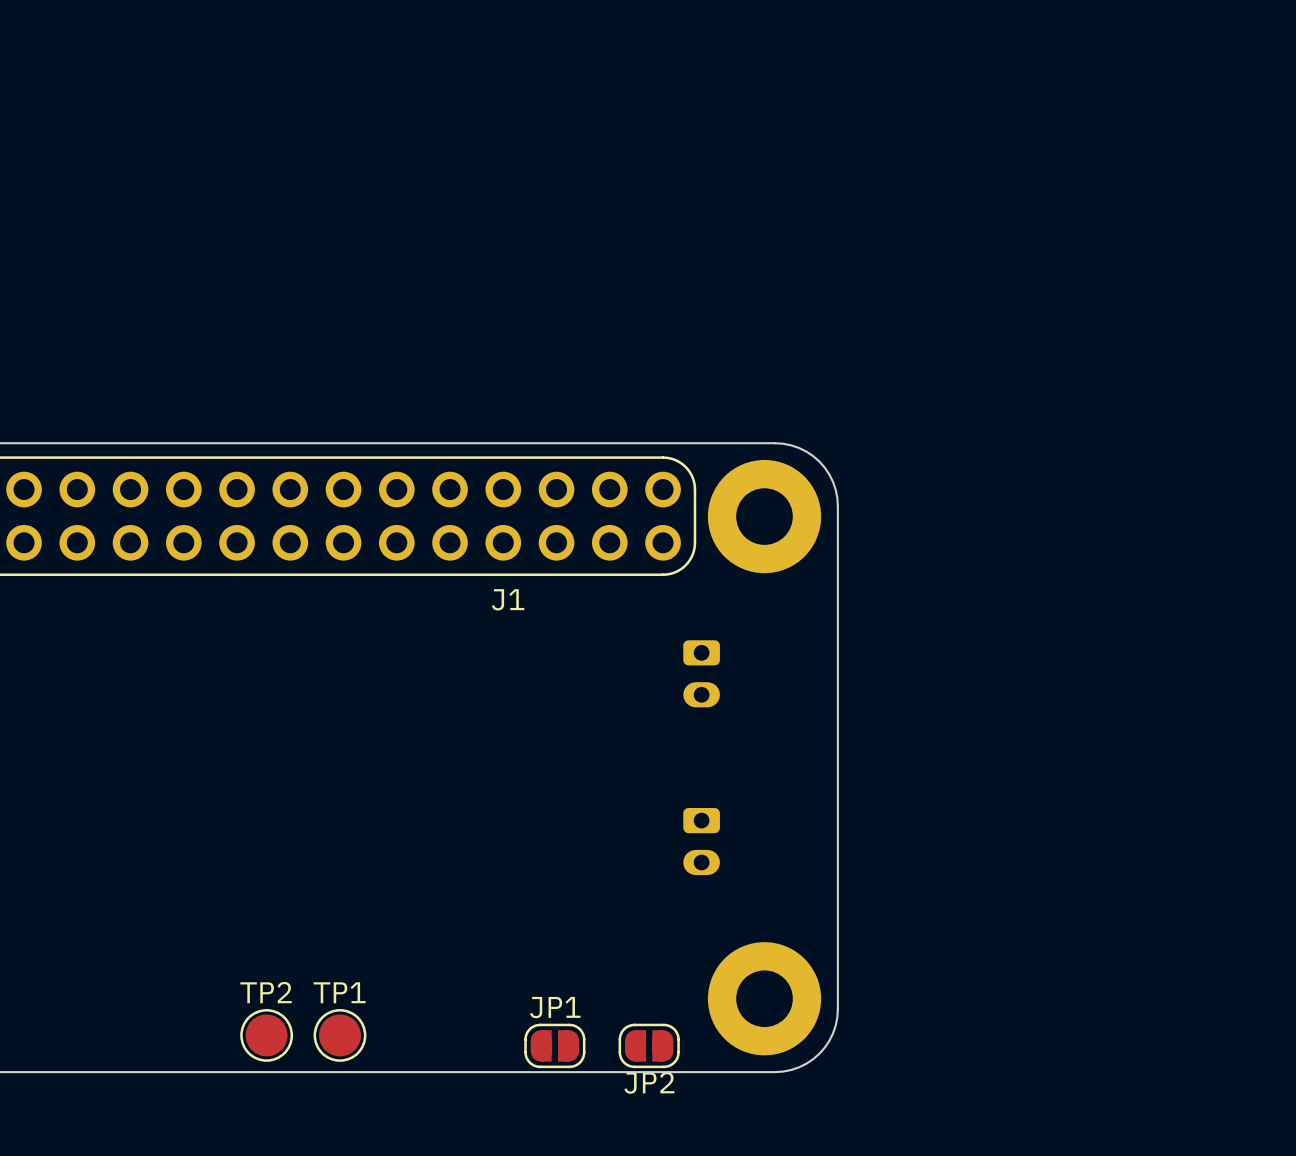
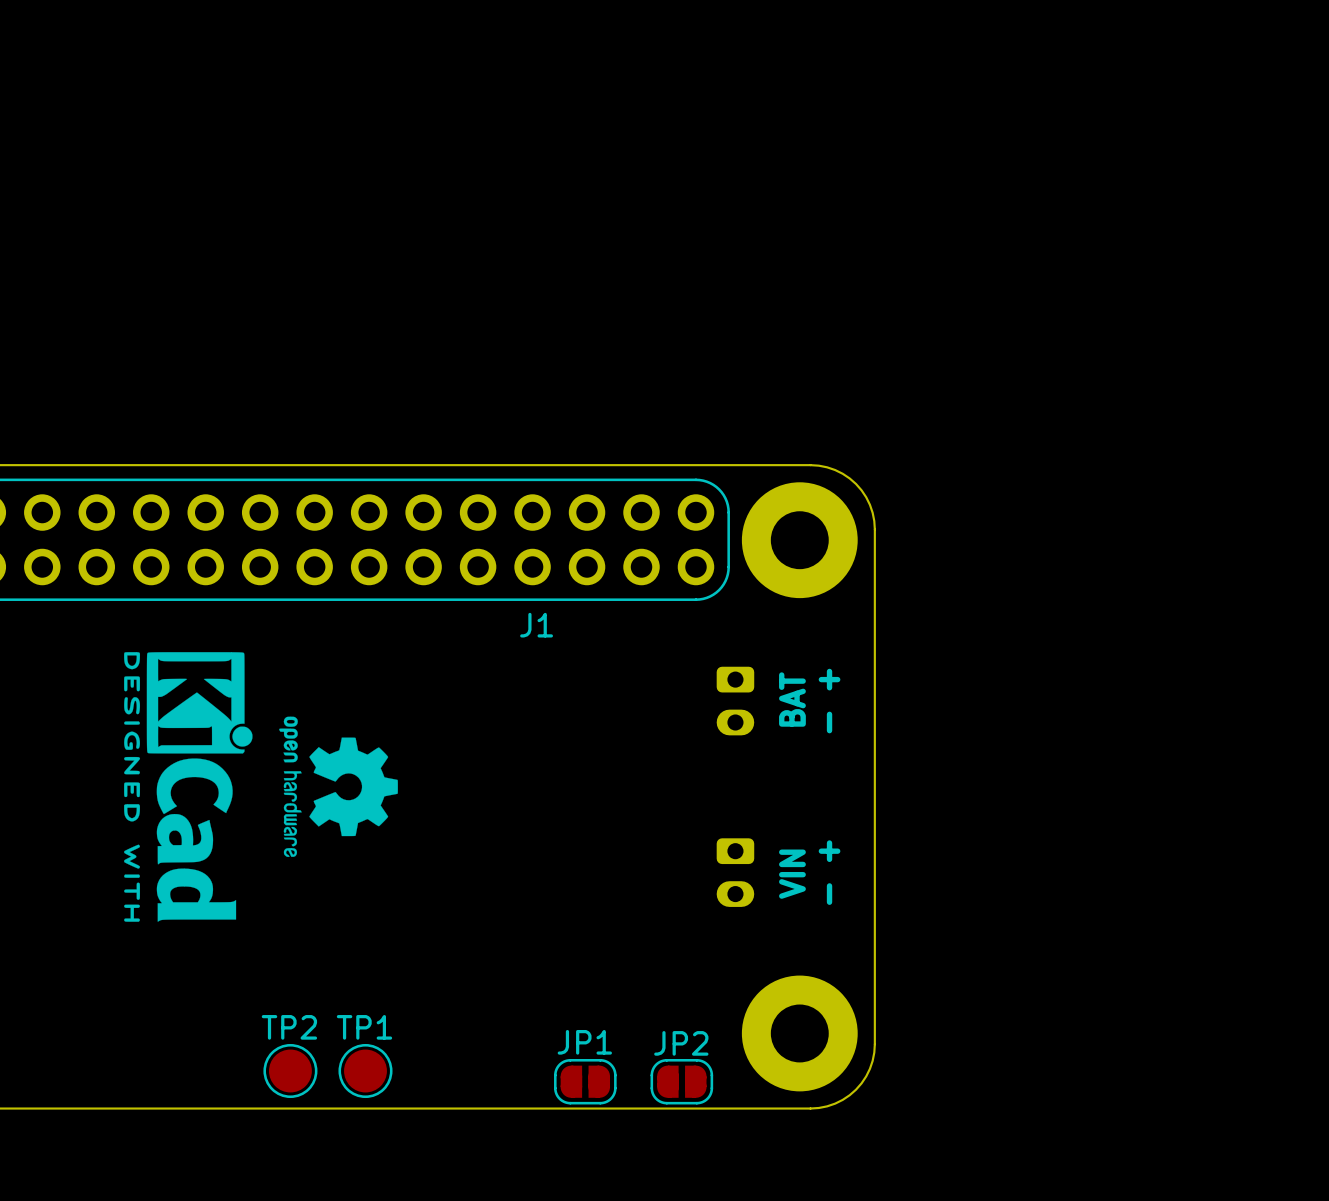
drawing: none -> [124, 652, 253, 922]
text: none -> - + (829, 701)
text: none -> BAT (792, 699)
drawing: none -> [279, 716, 398, 857]
text: none -> - + (829, 872)
text: none -> VIN (792, 874)
JP2 name position: JP2 (649, 1082) -> JP2 (681, 1043)

